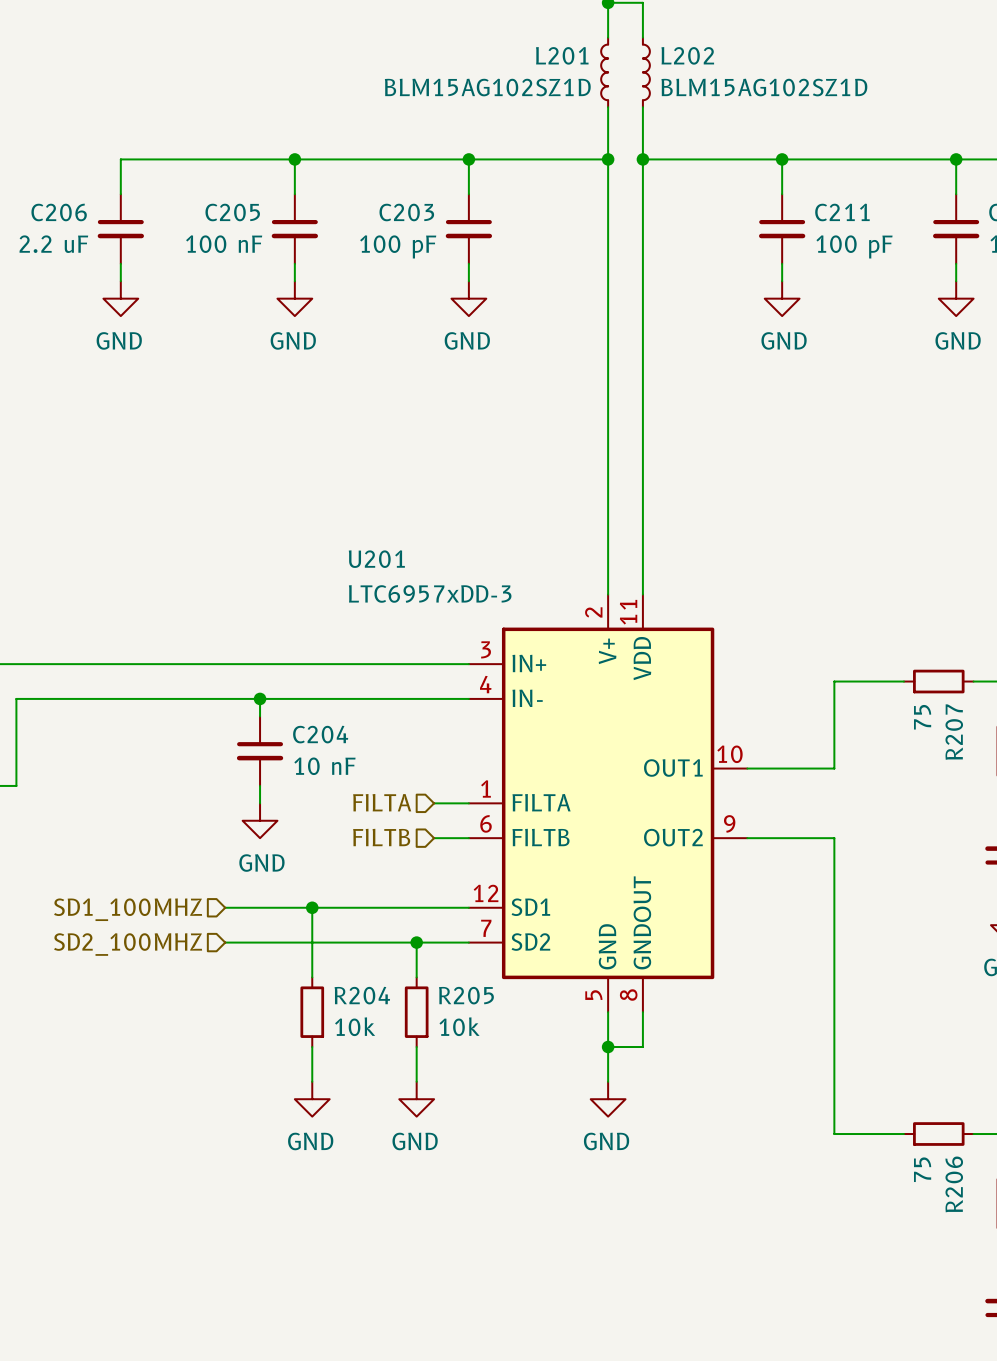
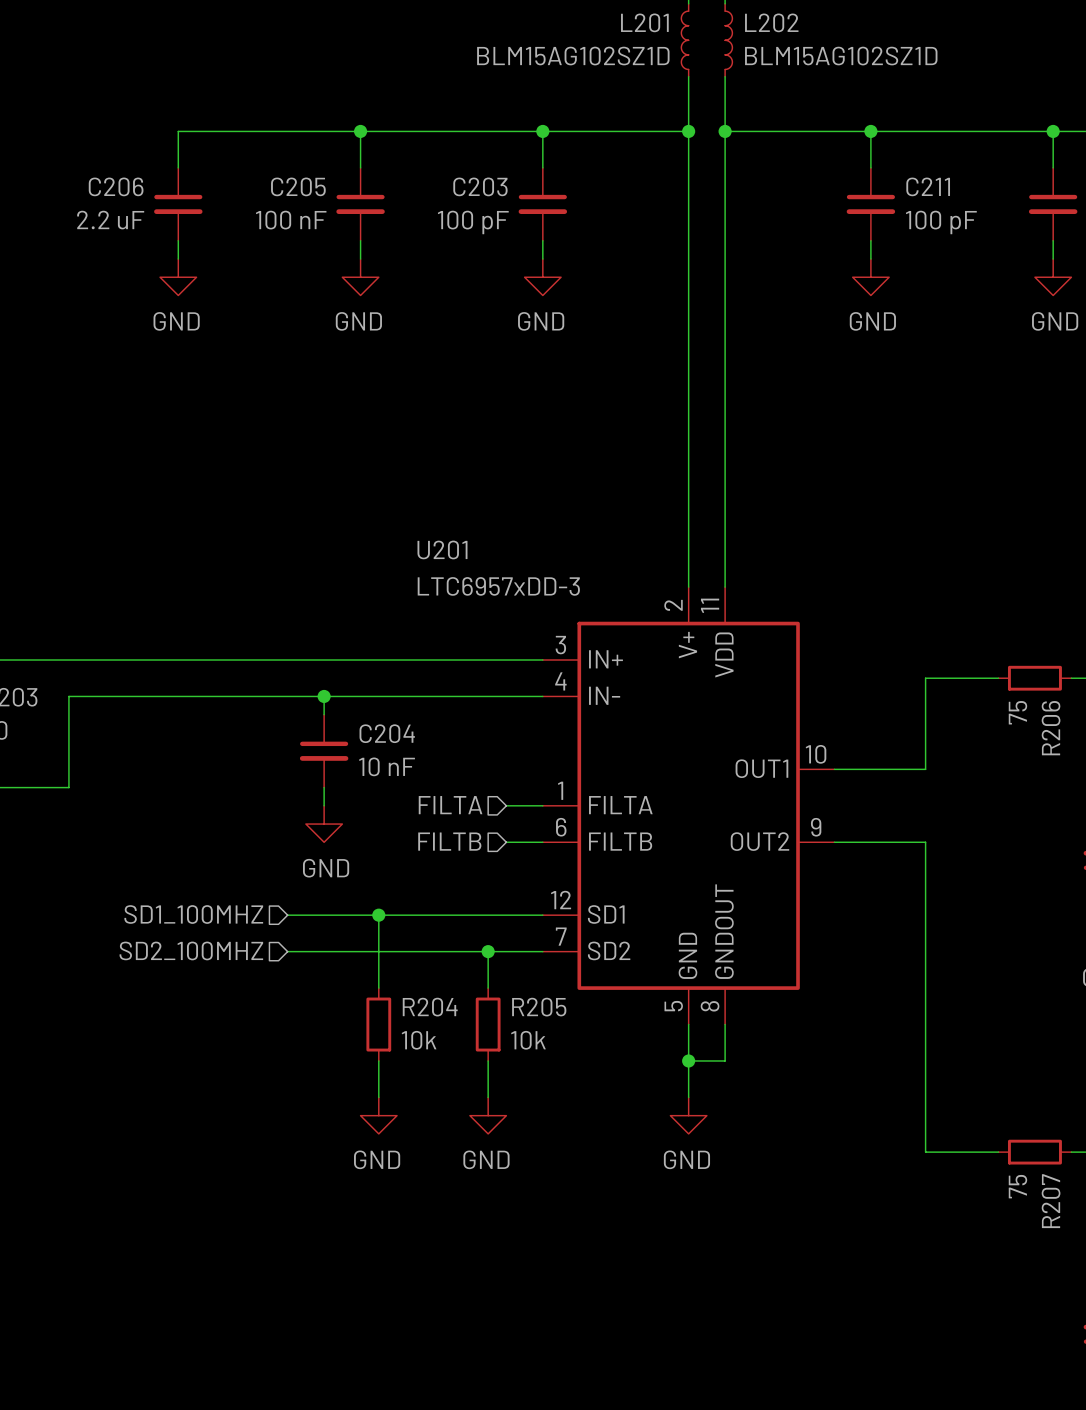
R207 name: R207 (954, 732) -> R206 (1051, 728)
R206 name: R206 (954, 1184) -> R207 (1051, 1201)

